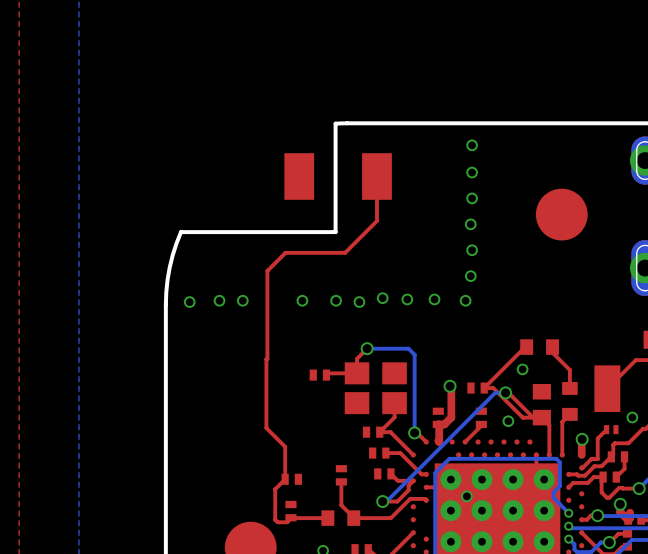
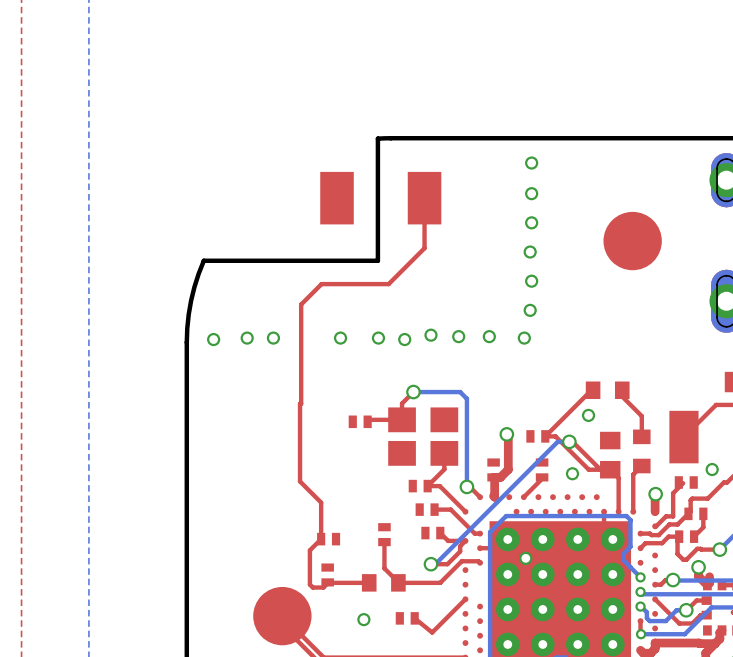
part footprint: [604, 425, 619, 435] -> [674, 476, 698, 489]

